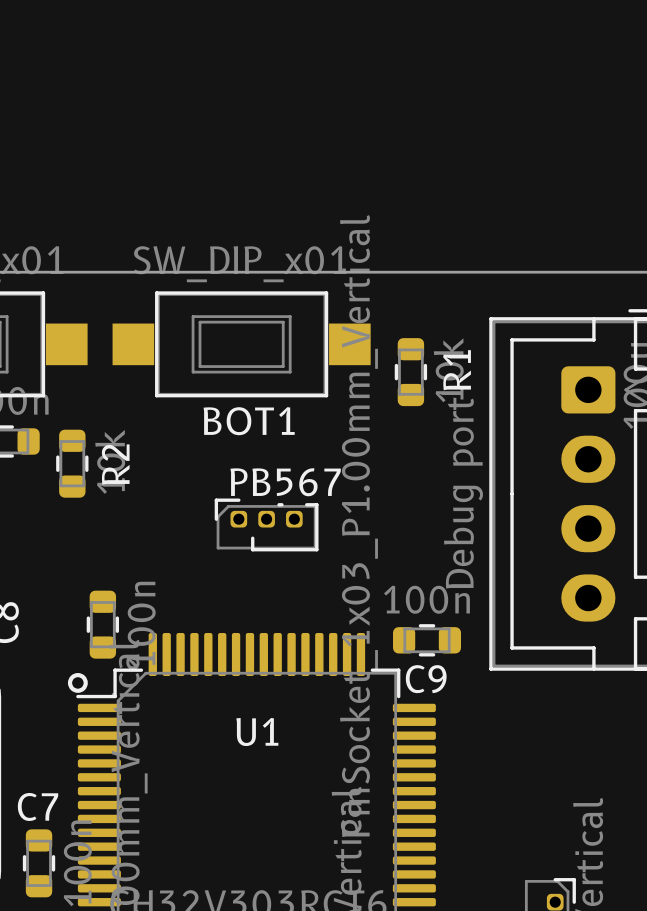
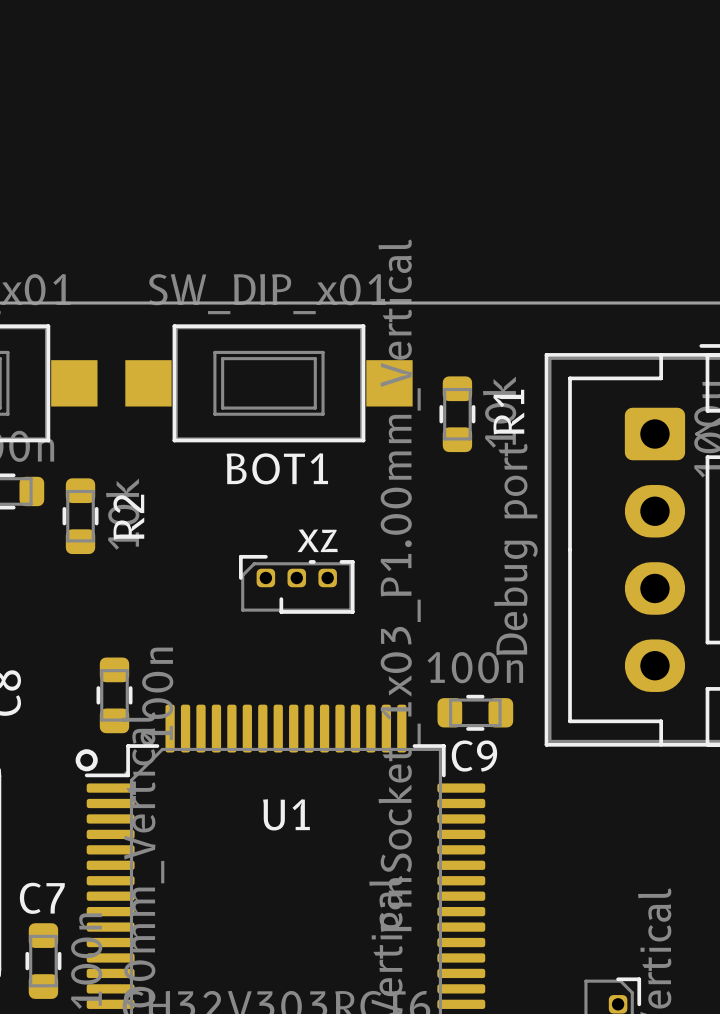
PB567 name: PB567 (285, 482) -> xz (317, 540)

